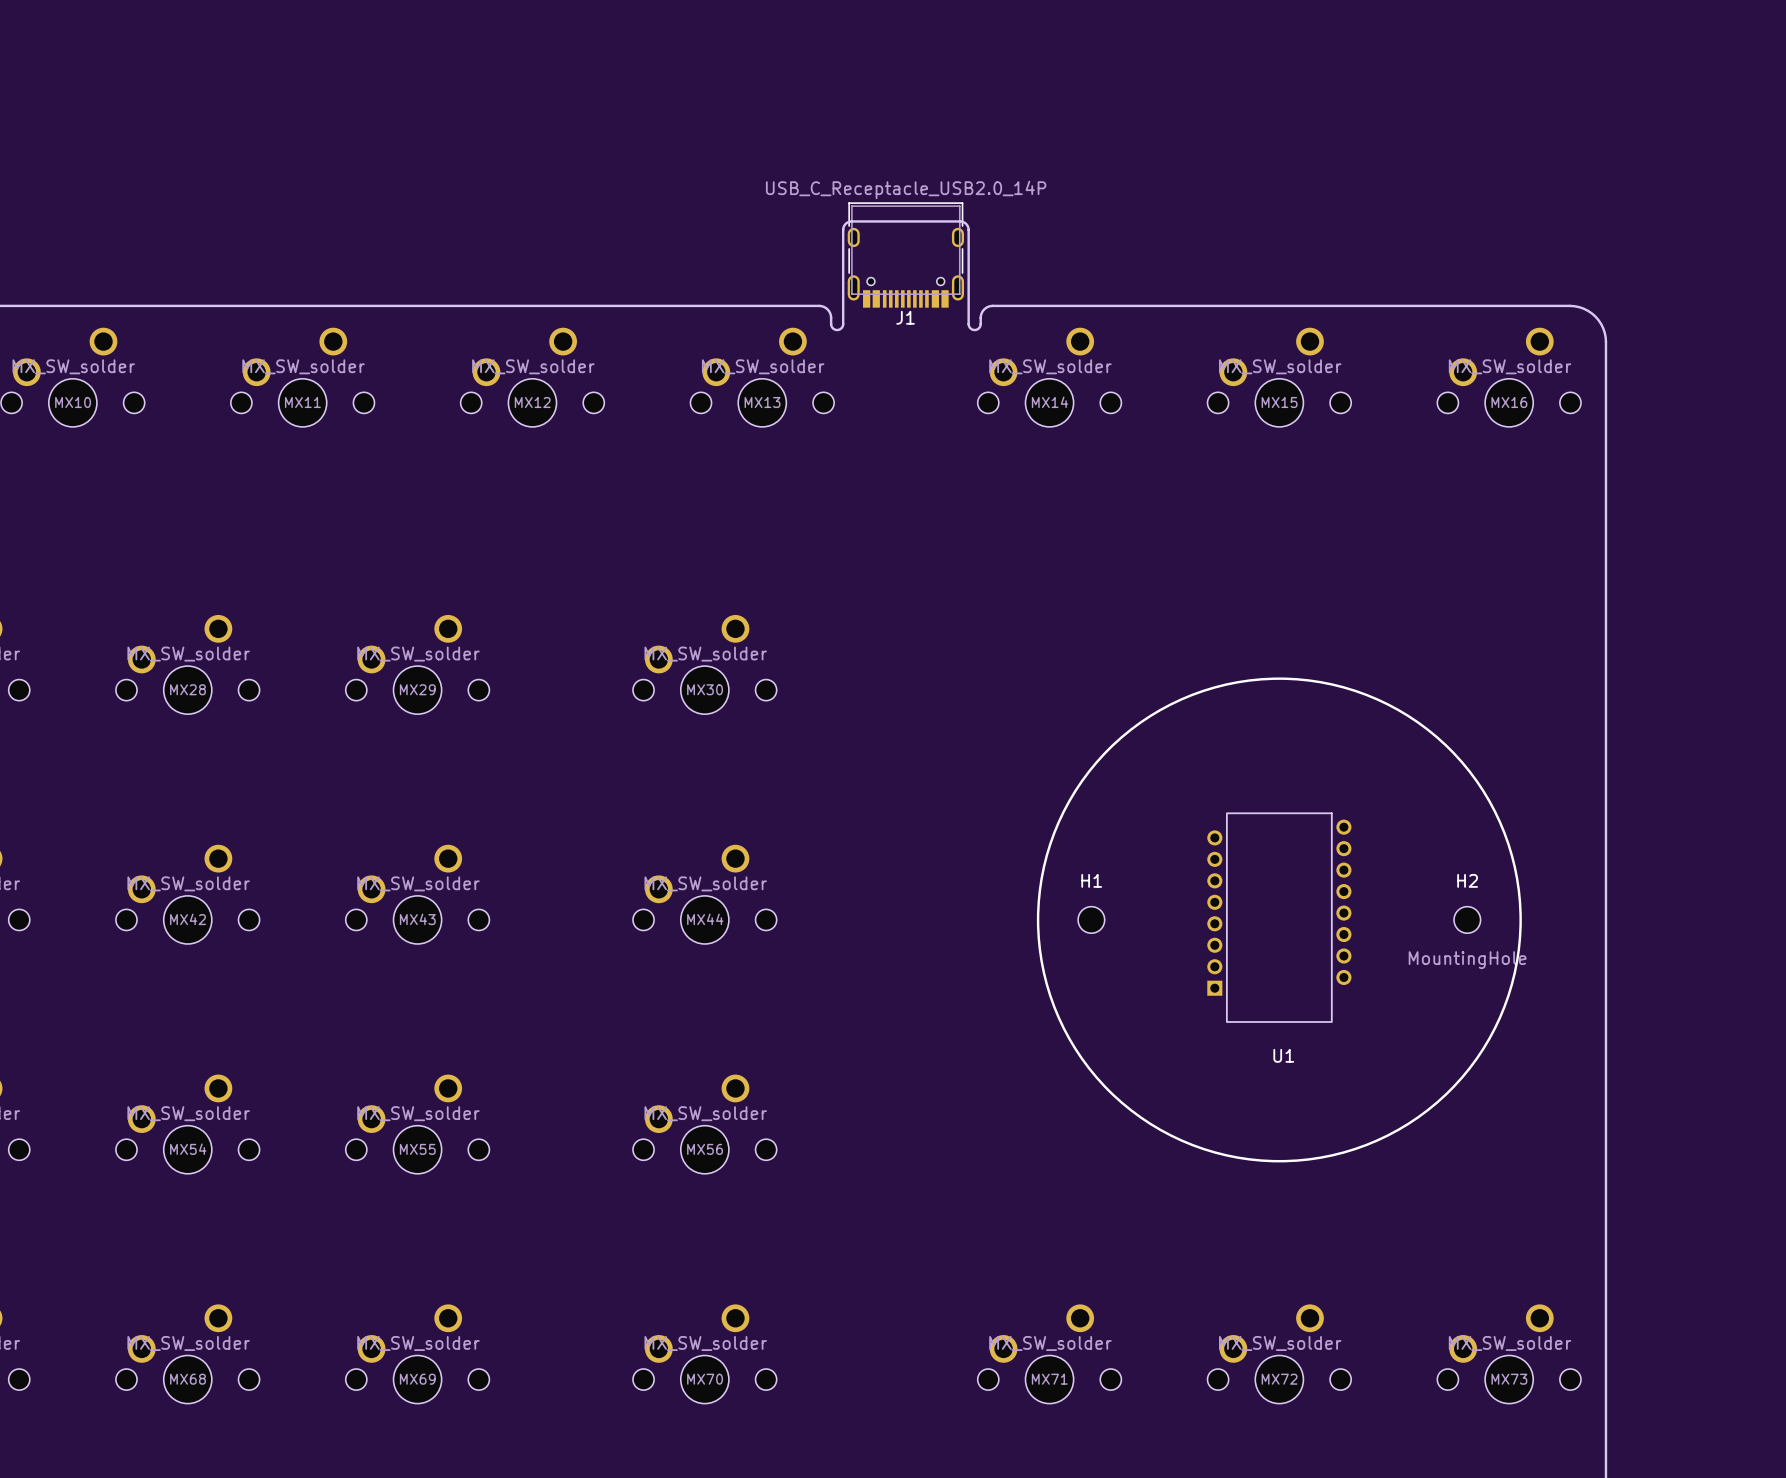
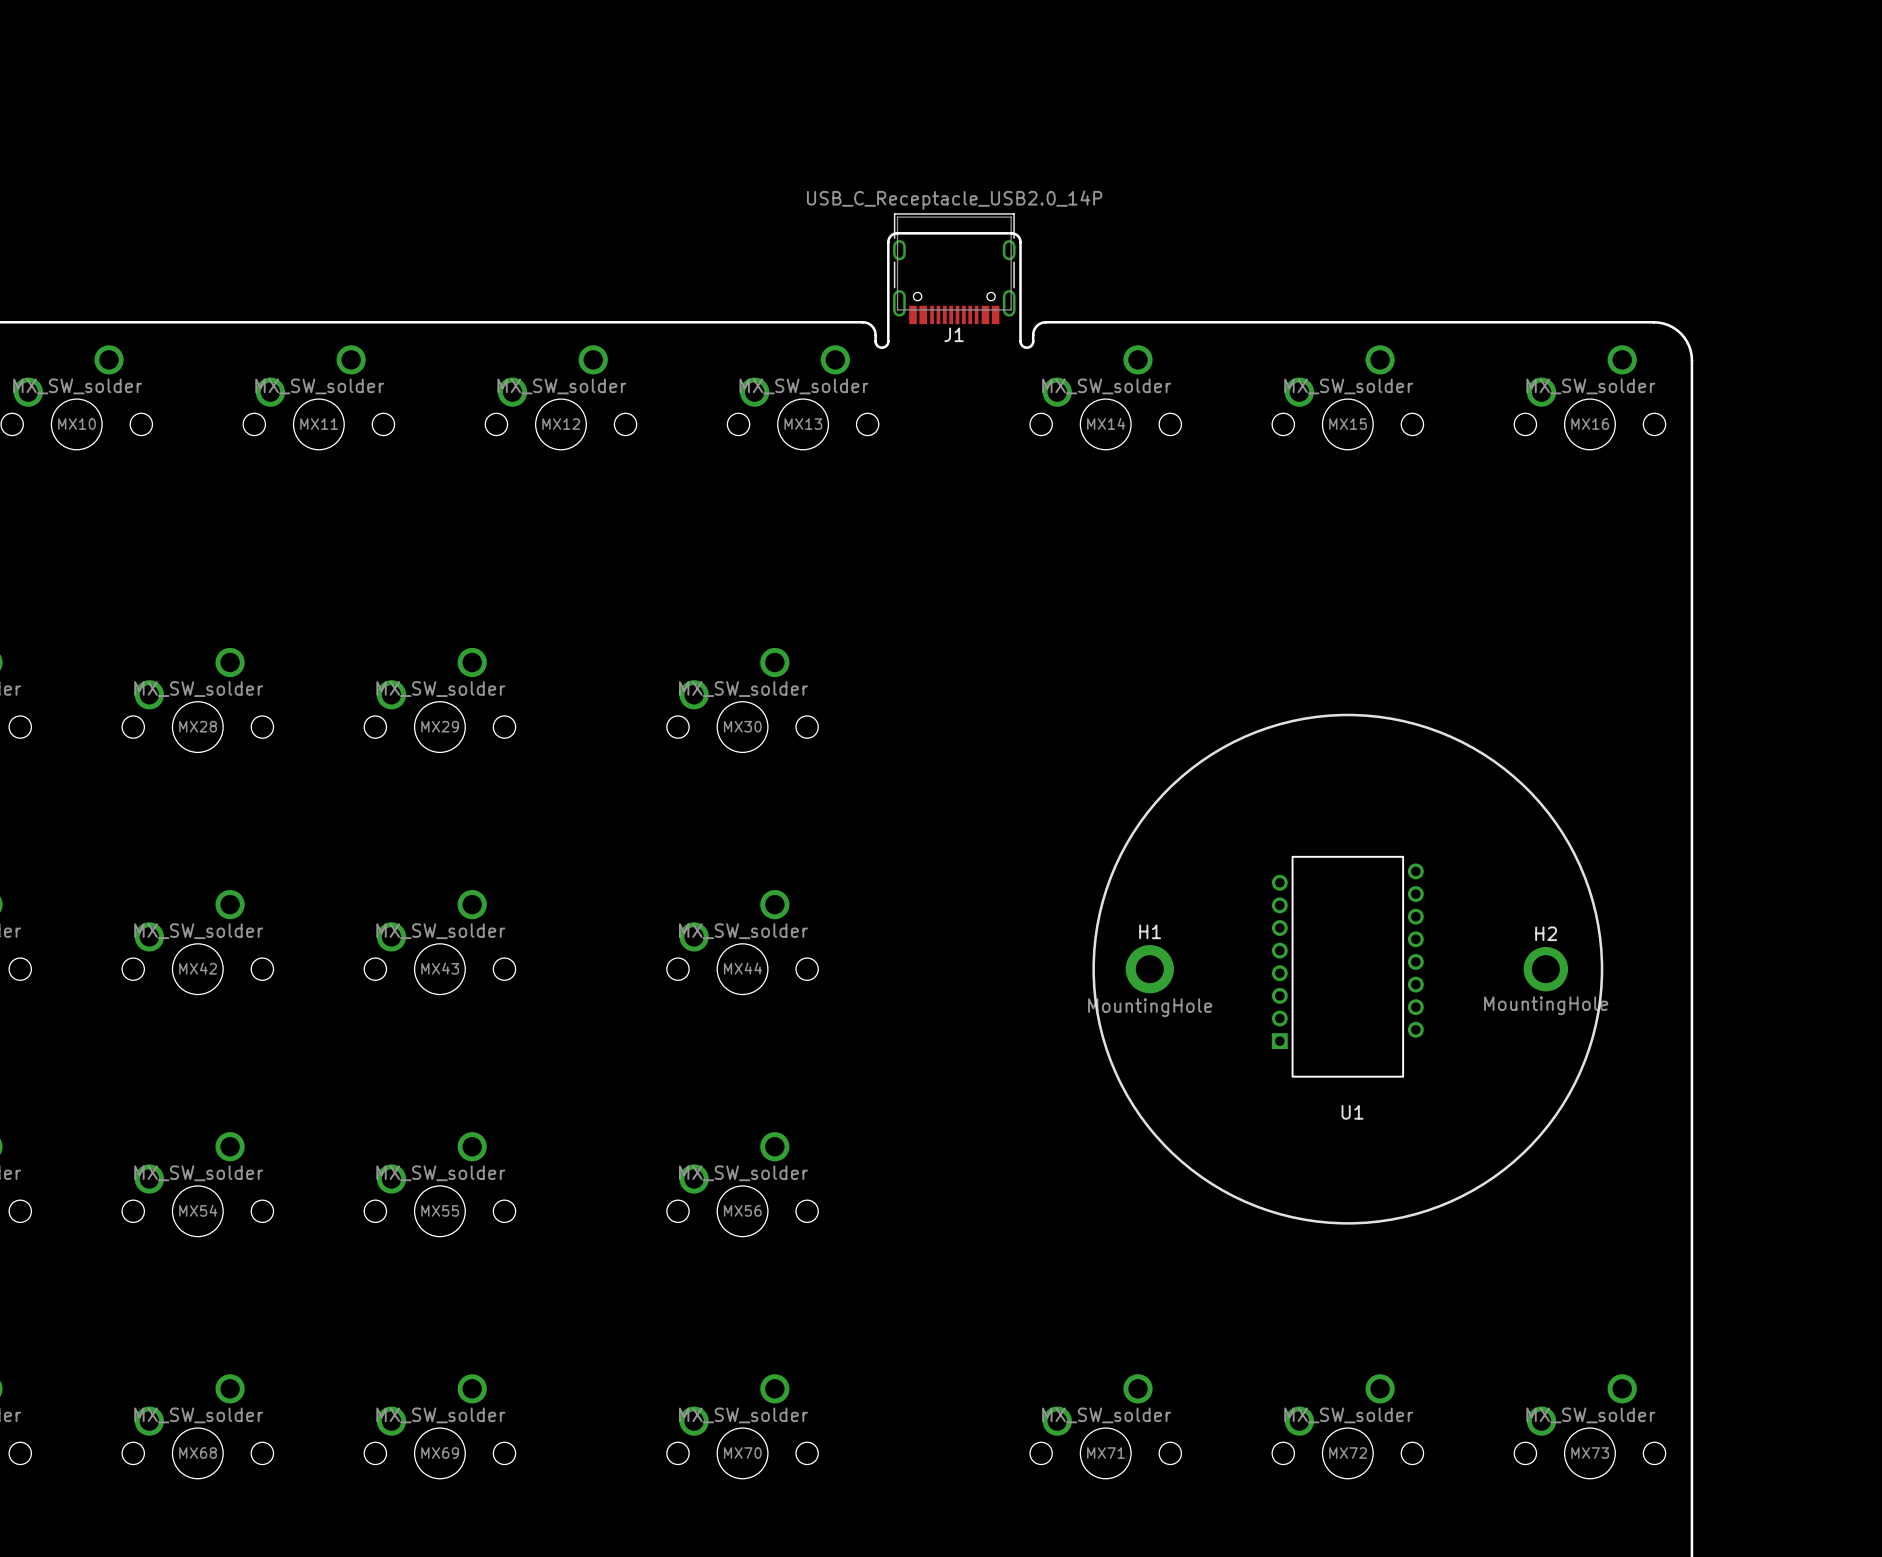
H1 footprint: [1078, 906, 1105, 934] -> [1125, 945, 1174, 994]
H2 footprint: [1454, 906, 1481, 934] -> [1523, 946, 1569, 992]
H1 value: none -> MountingHole (1150, 1007)

